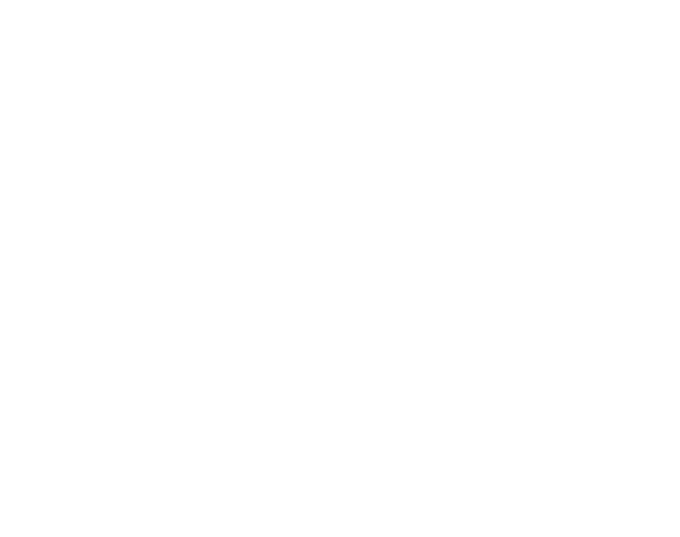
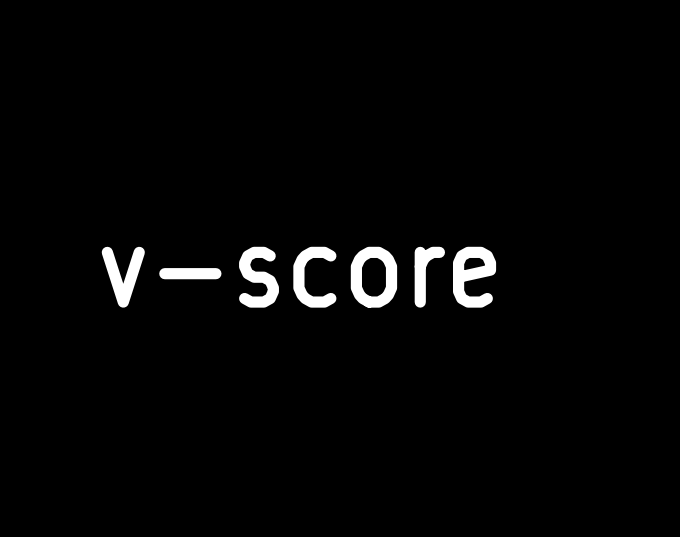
text: none -> v-score (298, 277)

